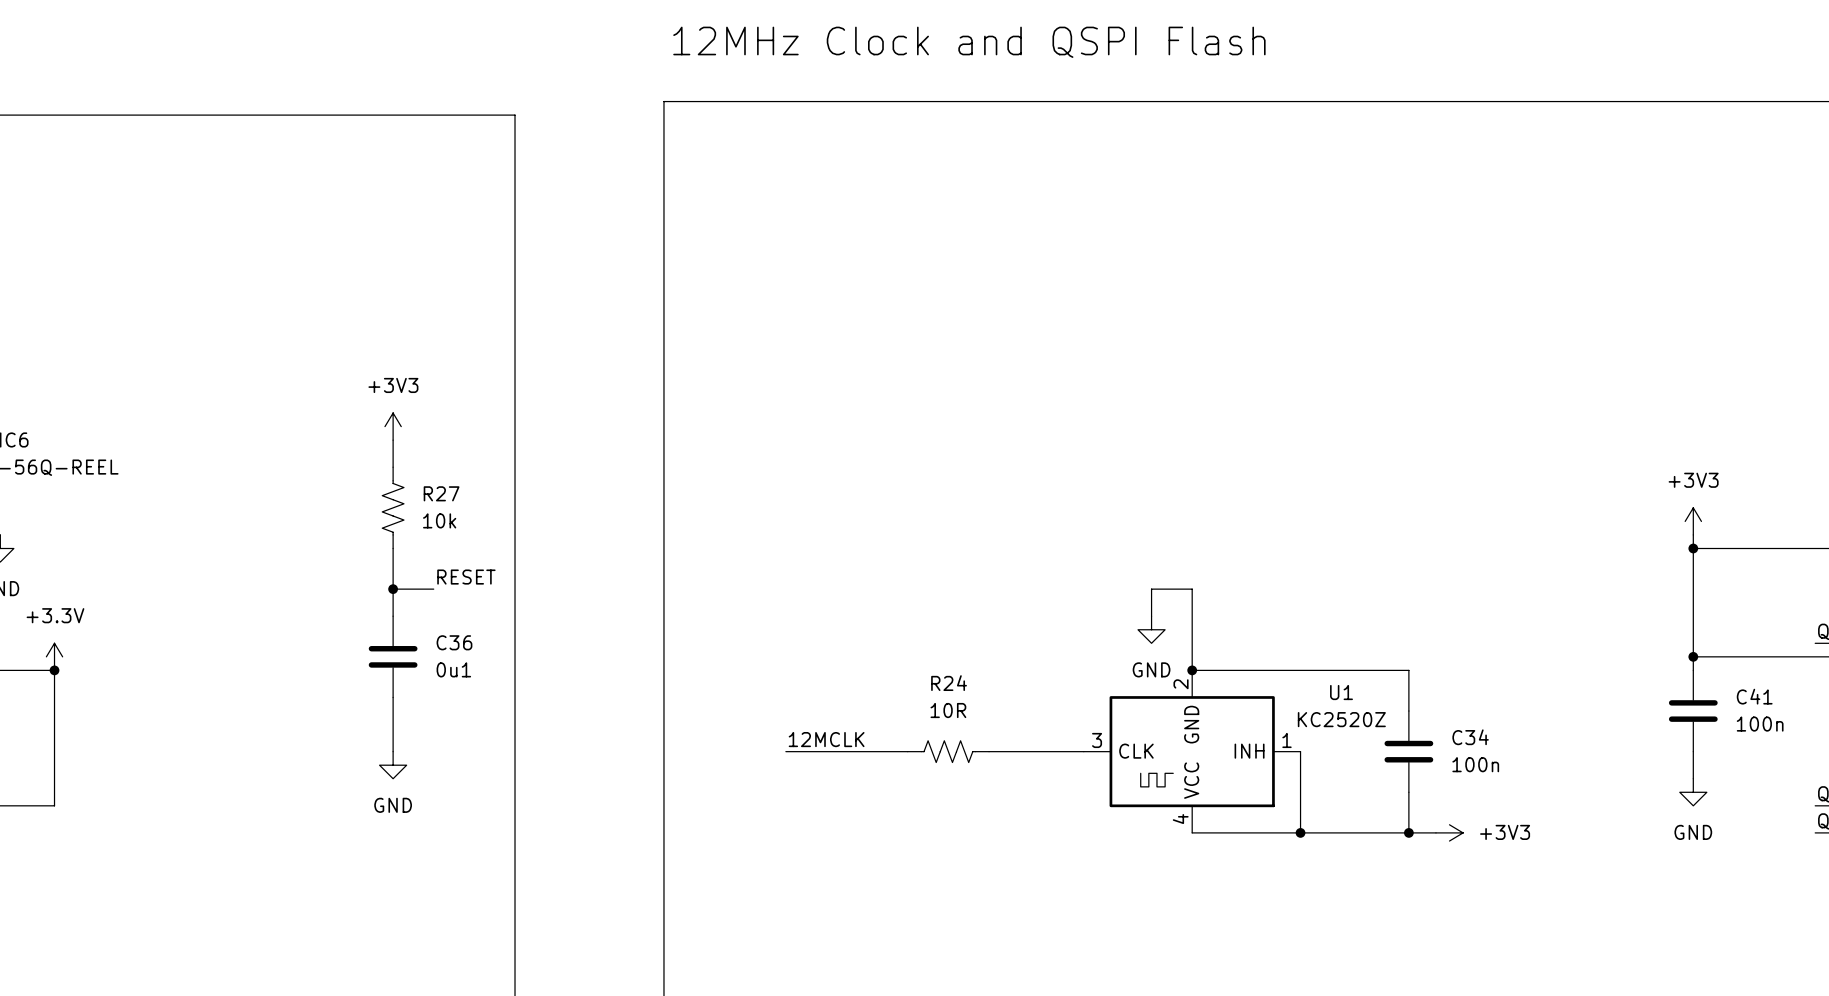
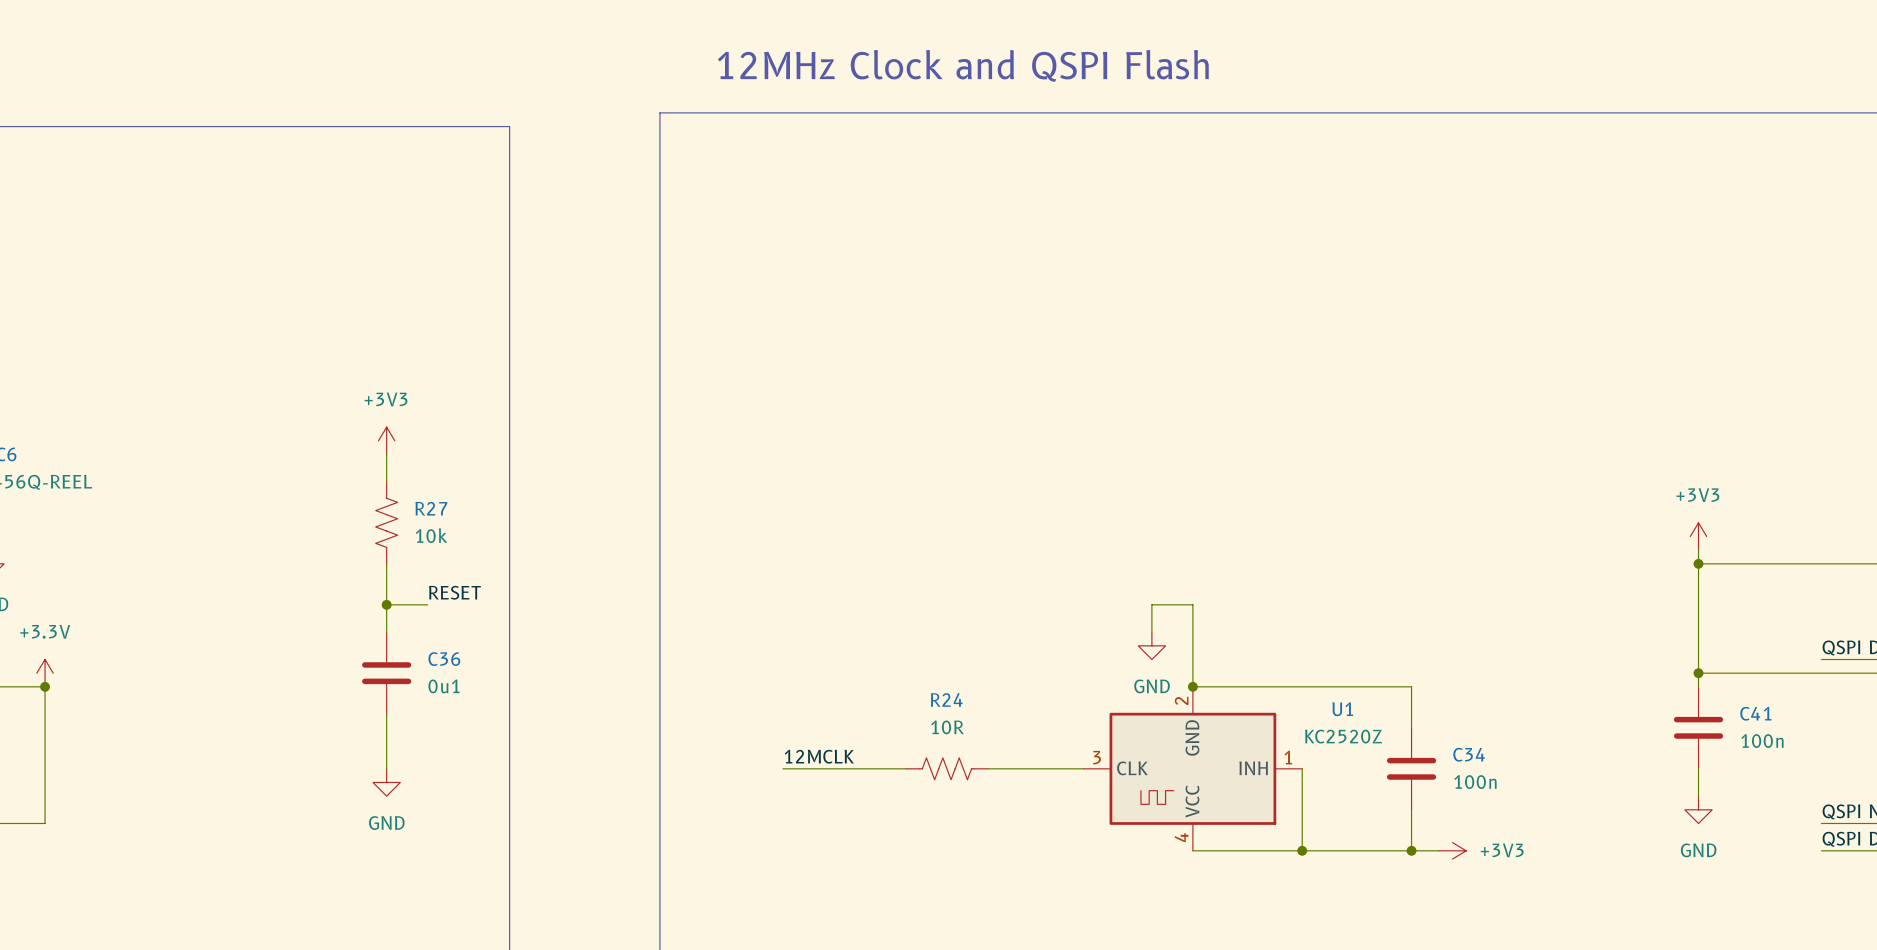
text position: 12MHz Clock and QSPI Flash (969, 42) -> 12MHz Clock and QSPI Flash (963, 65)

